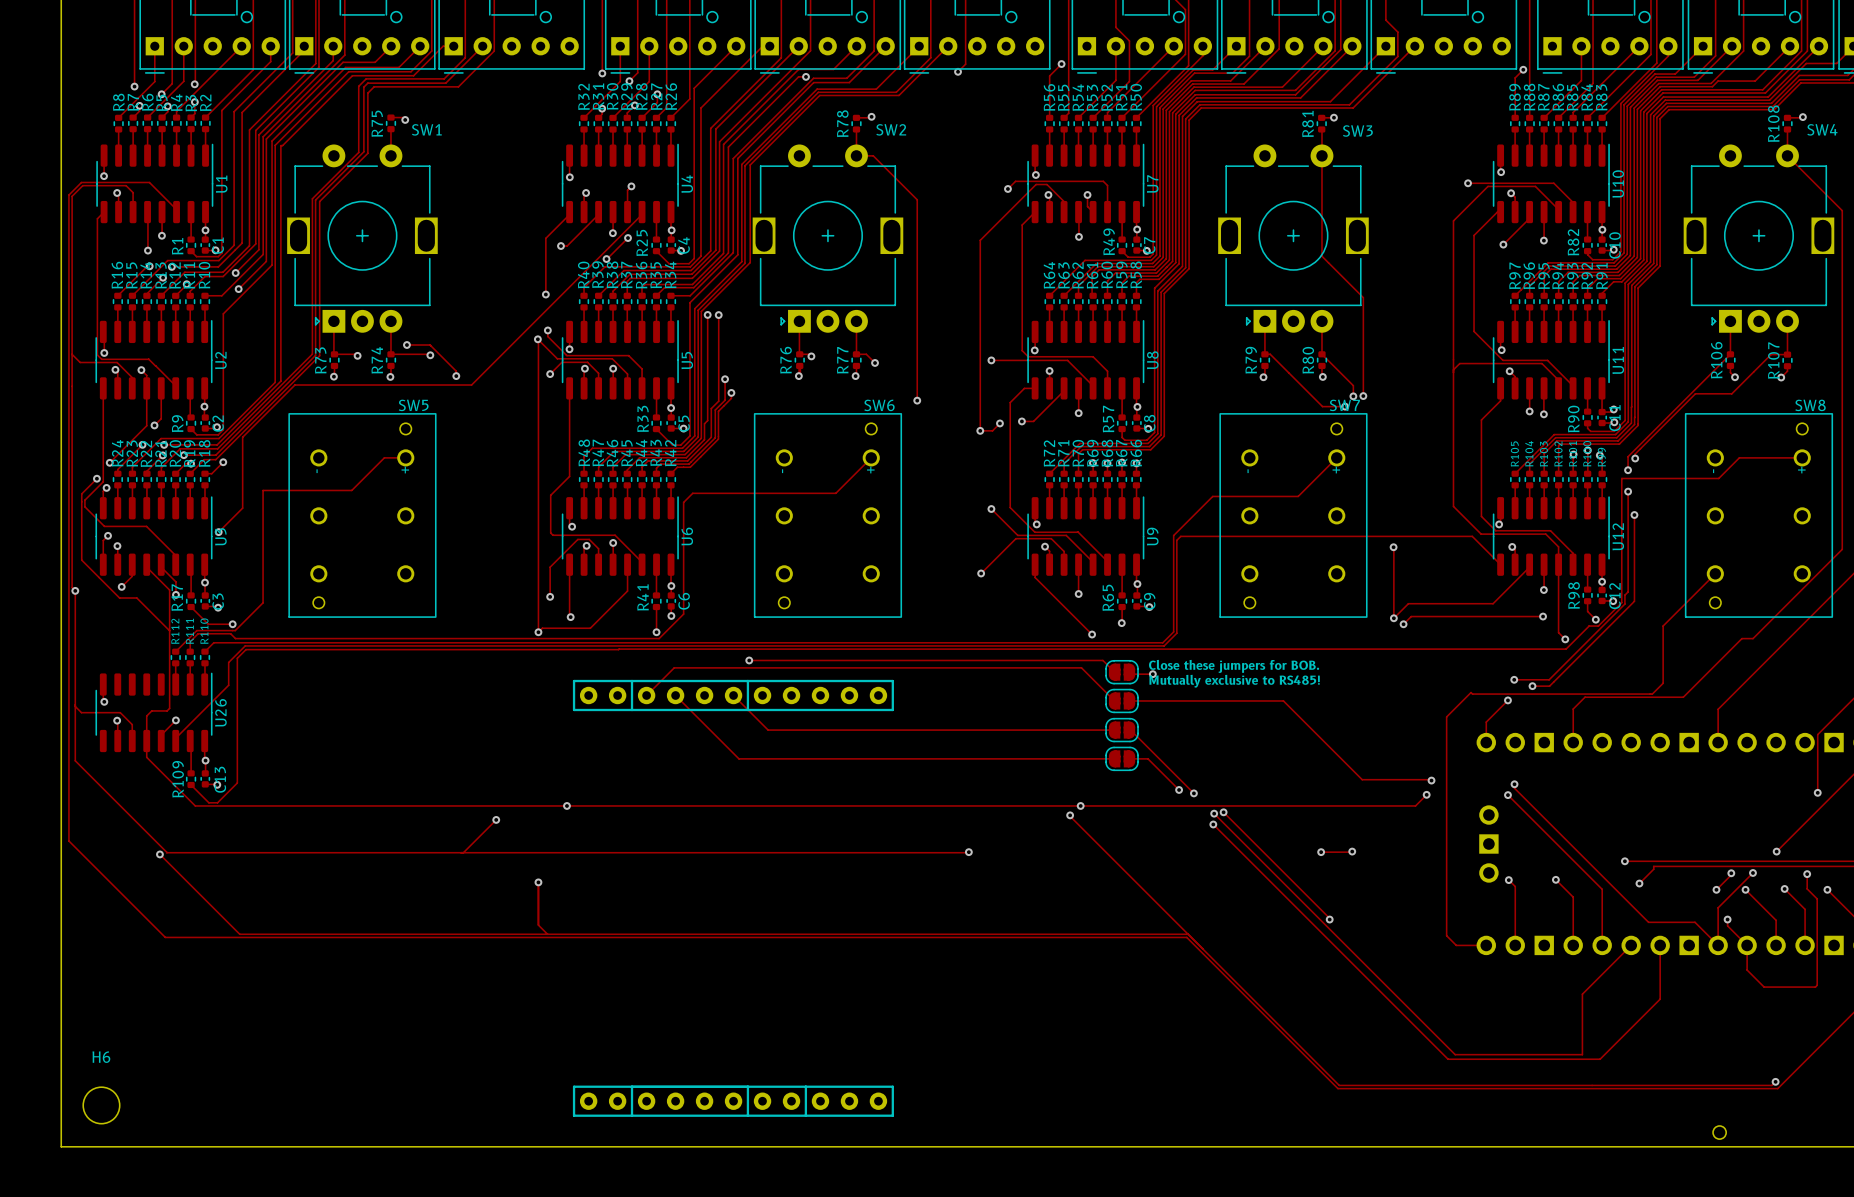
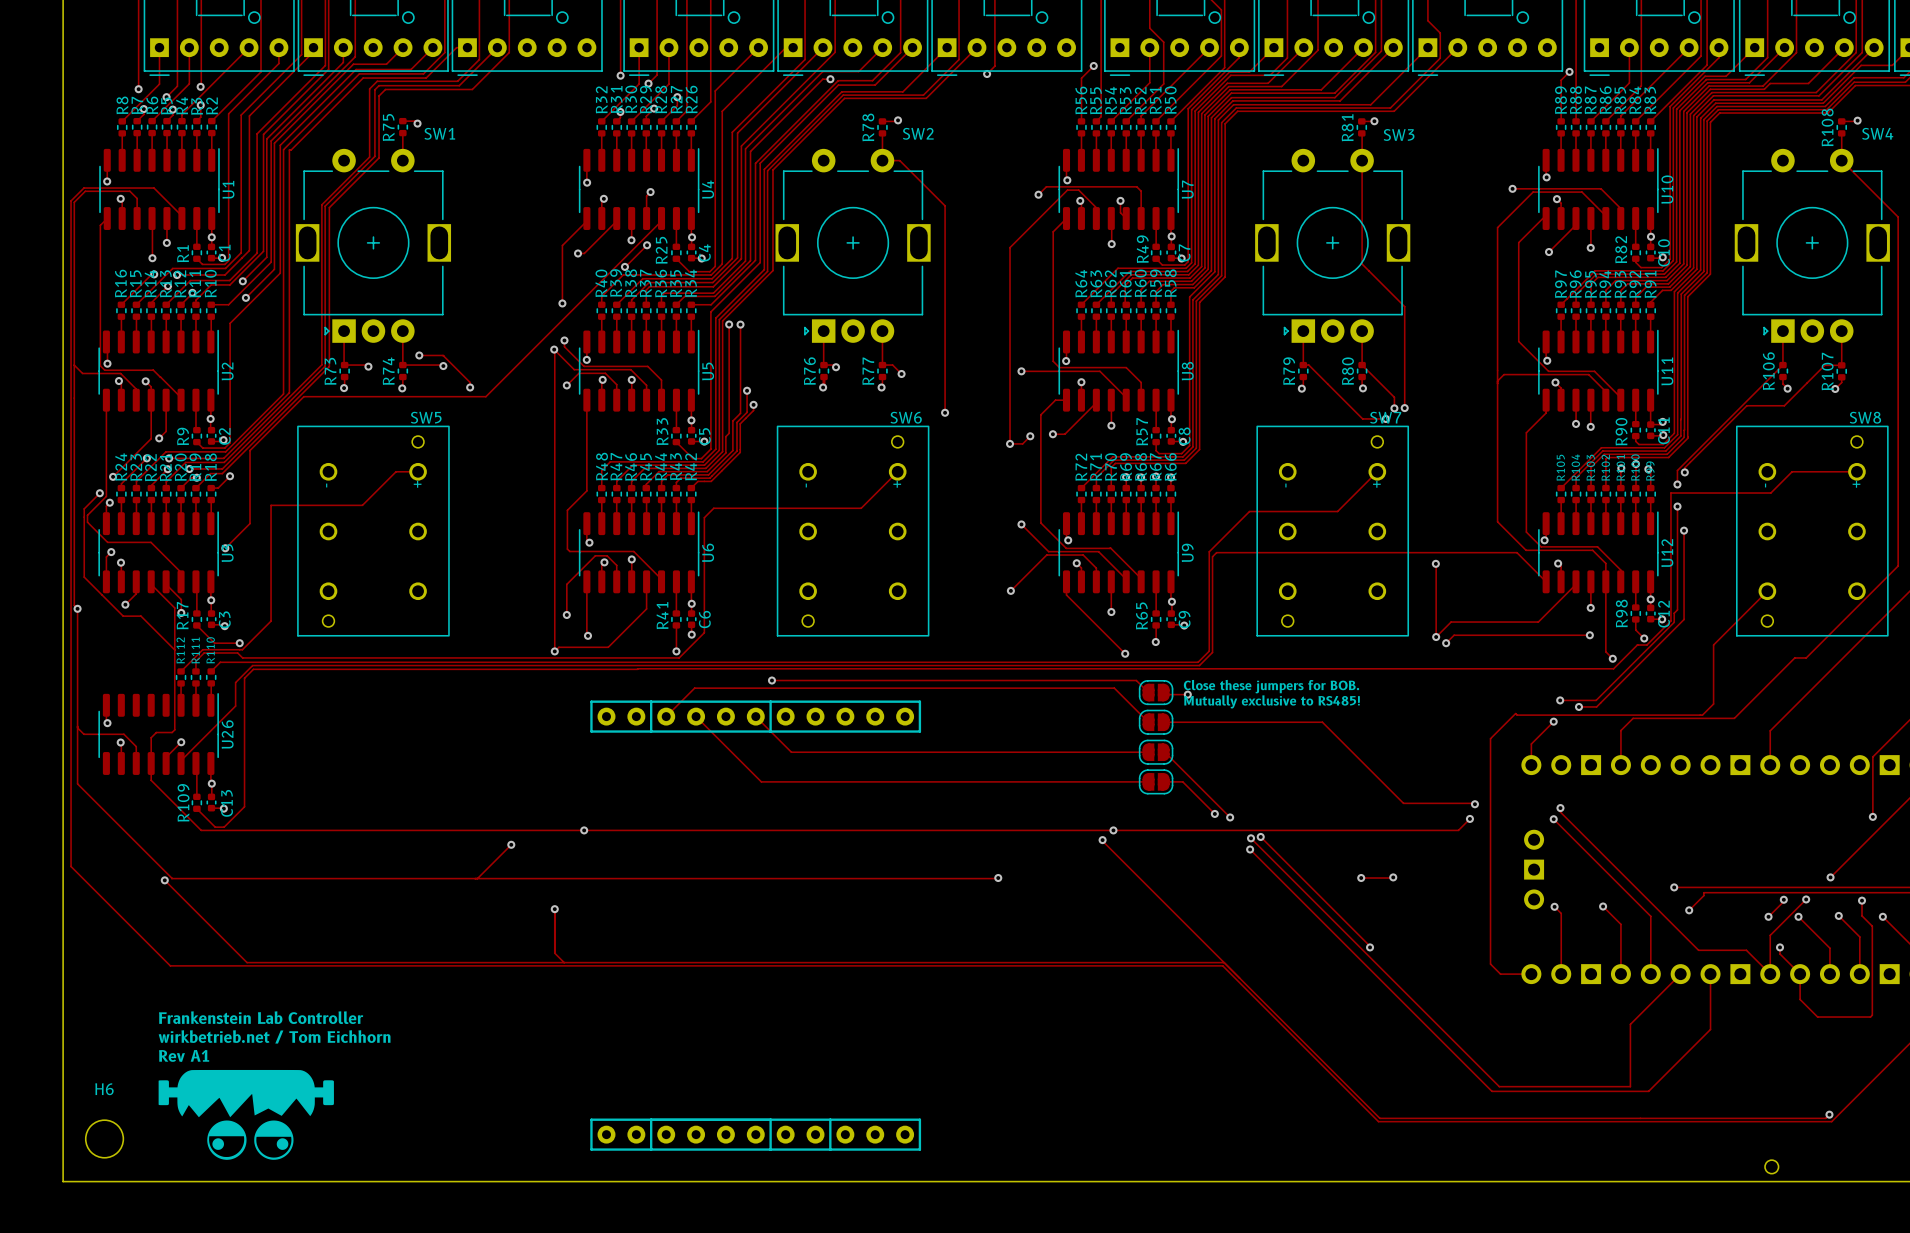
text: none -> Frankenstein Lab Controller (261, 1017)
text: none -> wirkbetrieb.net / Tom Eichhorn (274, 1036)
text: none -> Rev A1 (184, 1055)
drawing: none -> [158, 1069, 334, 1160]

